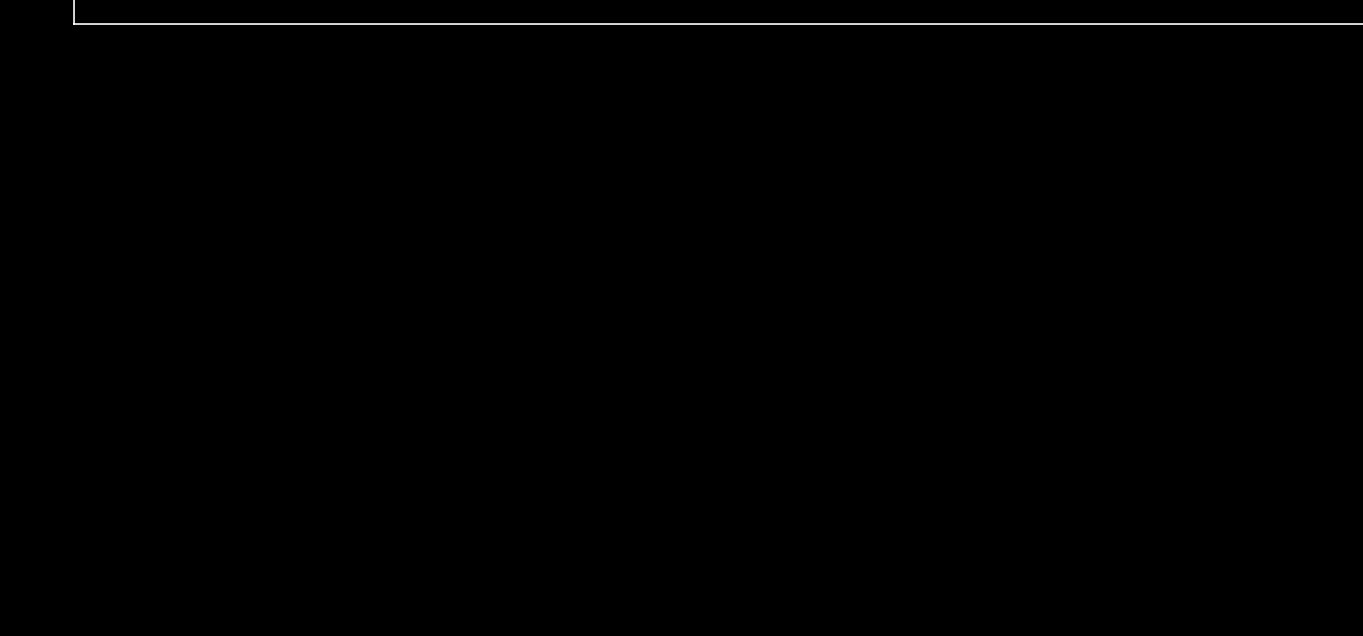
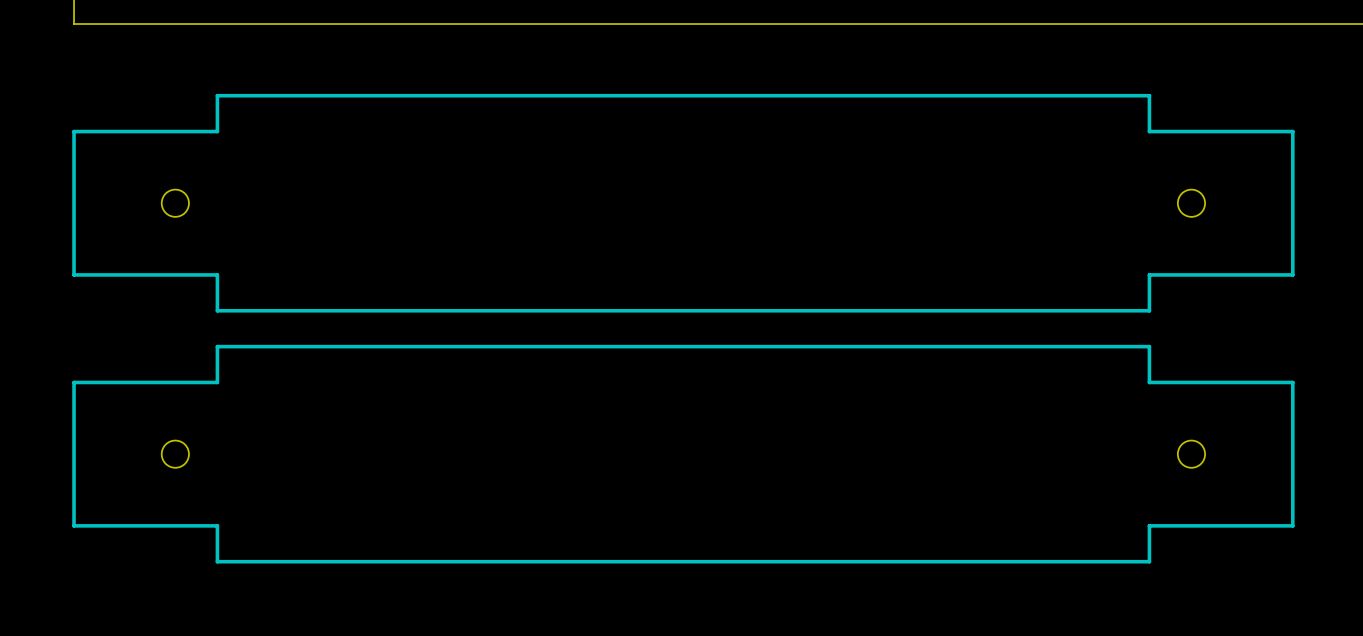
part: none -> (683, 203)
part: none -> (683, 454)

